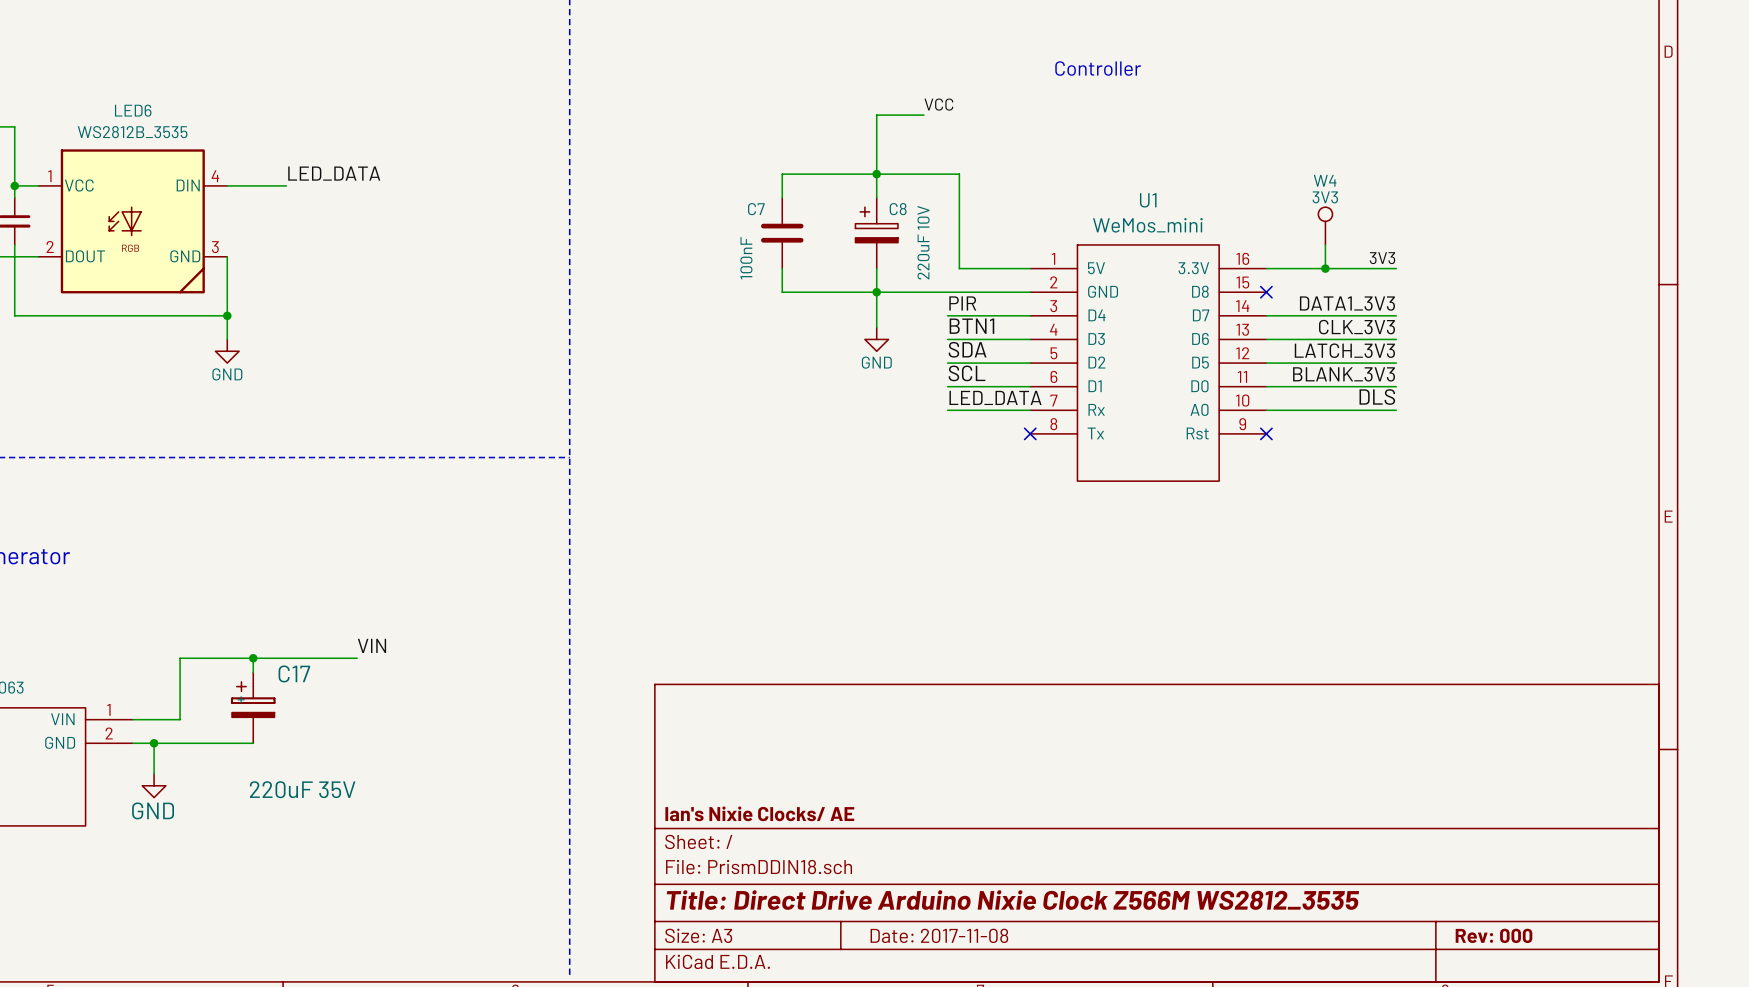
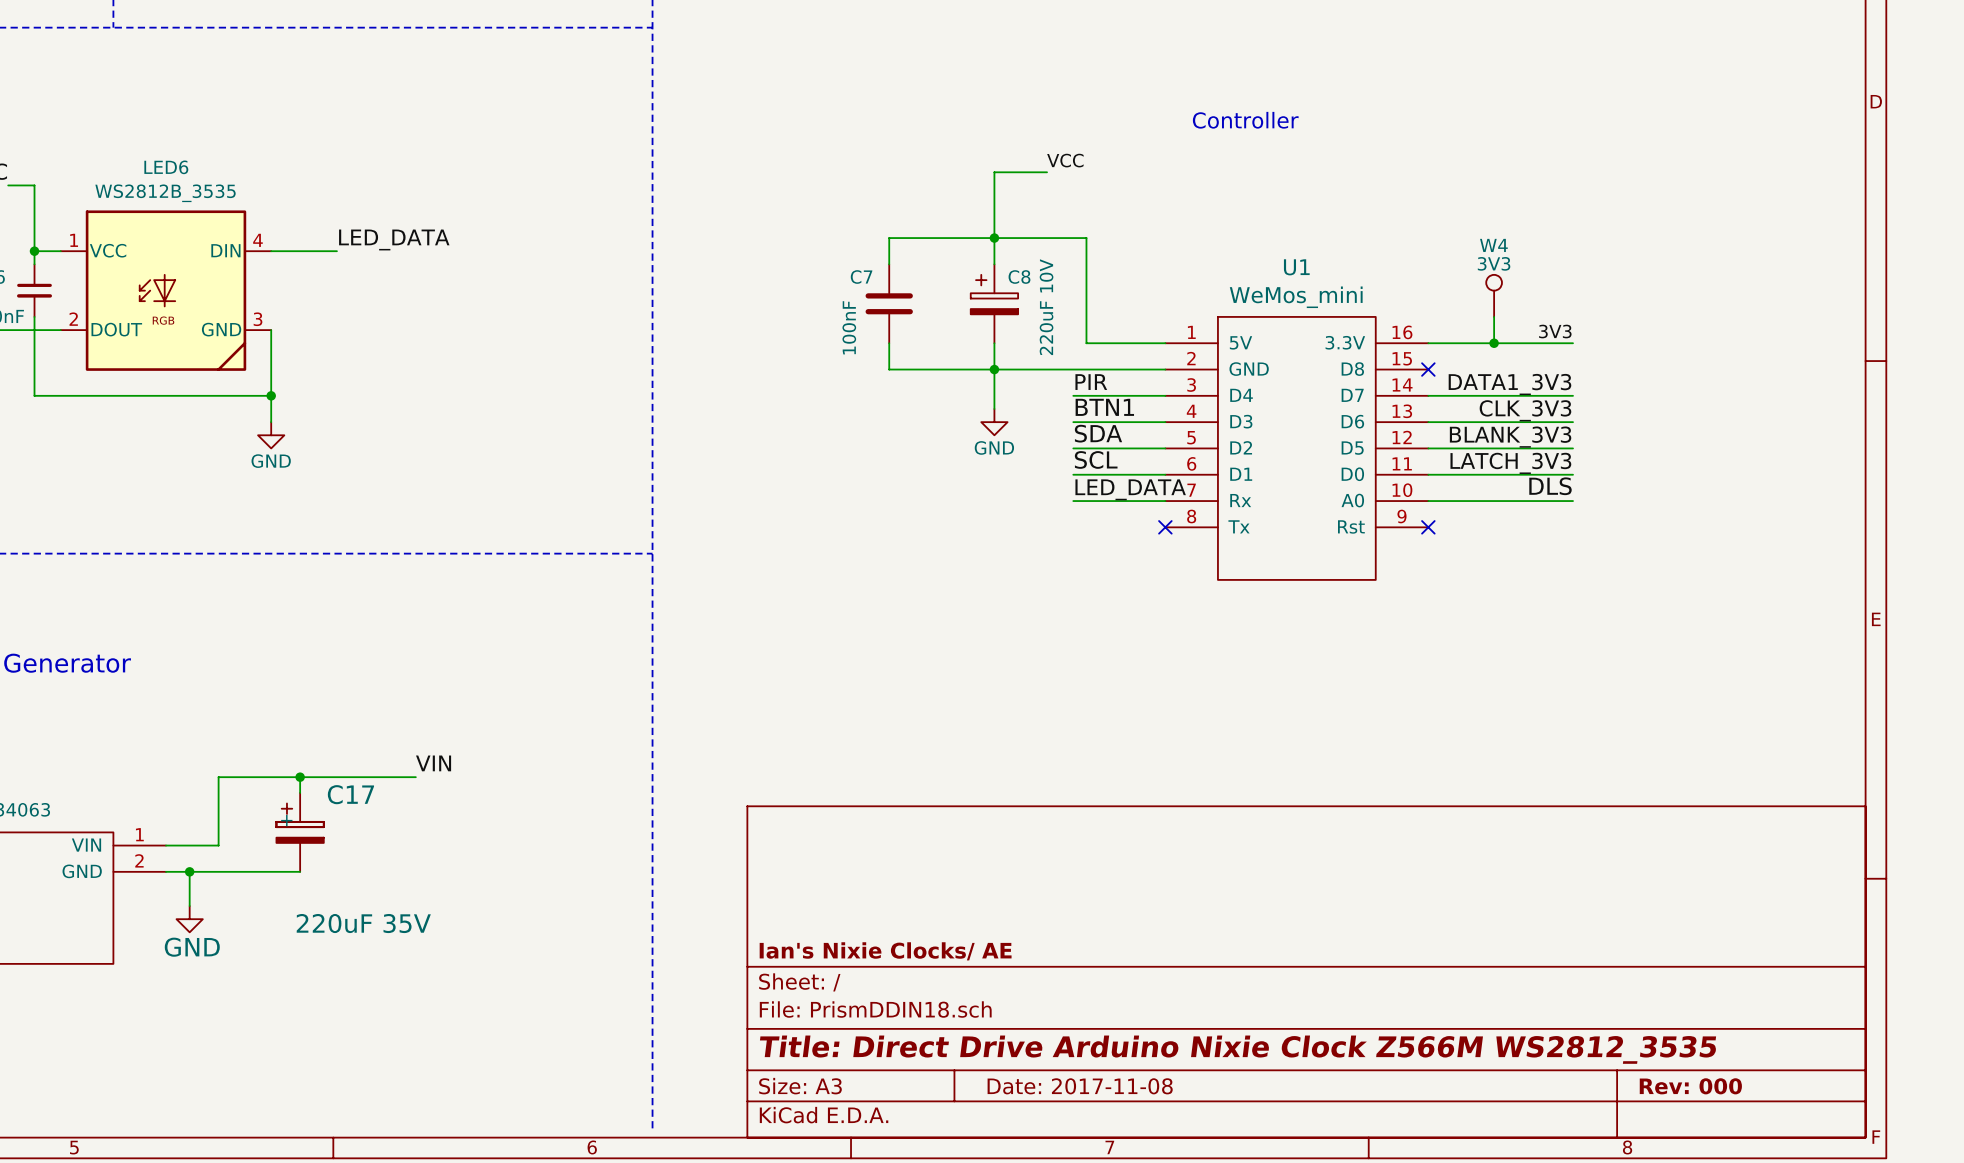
label: LATCH_3V3 (1344, 350) -> BLANK_3V3 (1510, 437)
label: BLANK_3V3 (1344, 374) -> LATCH_3V3 (1510, 463)

